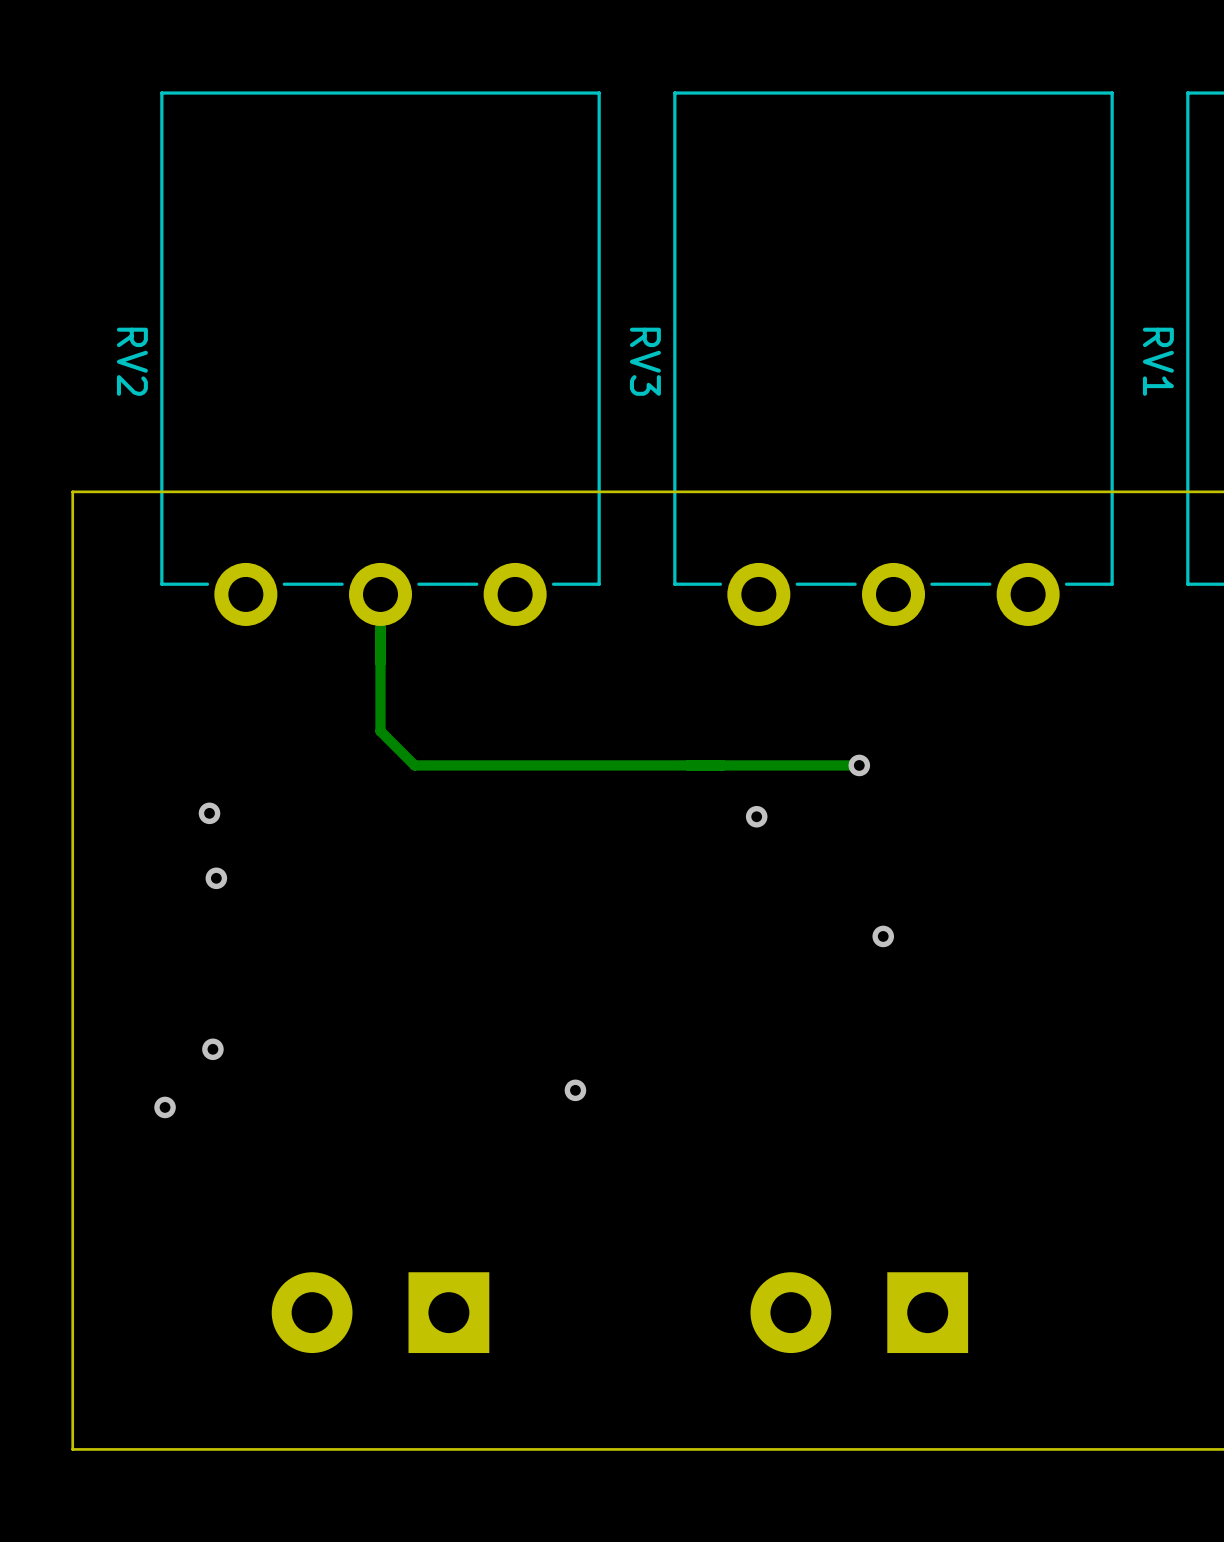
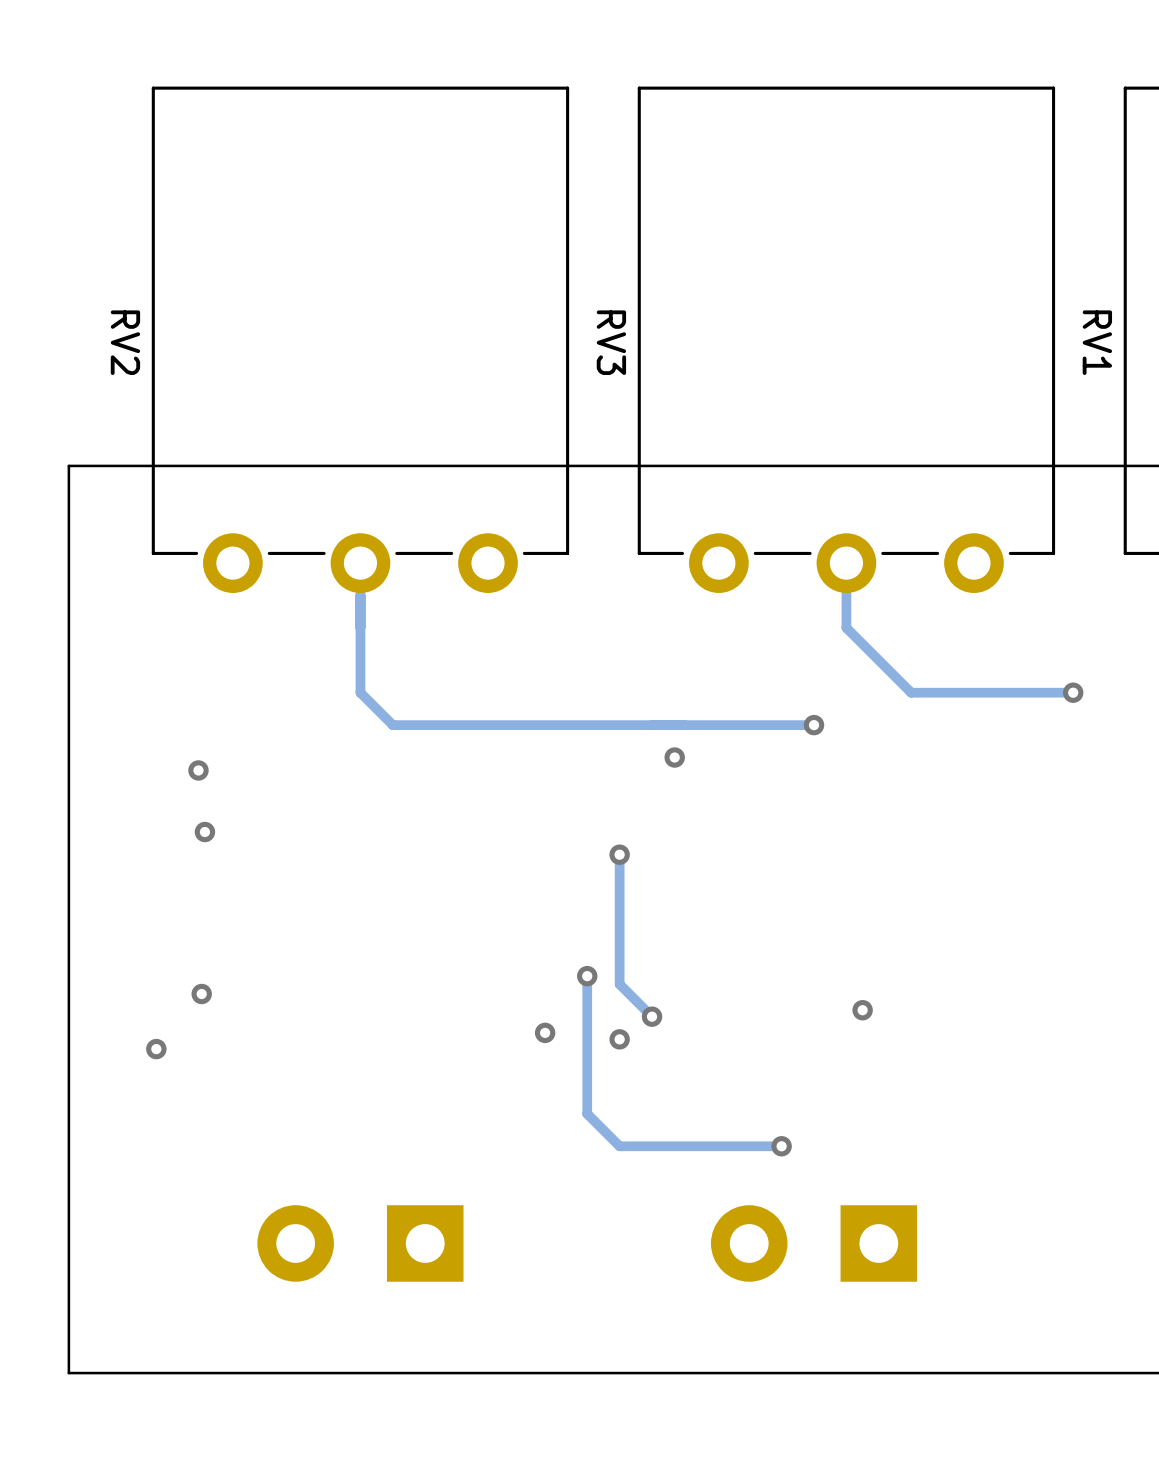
track: none -> (846, 563) (846, 627) (911, 692) (1073, 692)
via: none -> (1073, 692)
via position: (756, 816) -> (674, 757)
track: none -> (619, 854) (619, 984) (652, 1016)
via: none -> (619, 854)
via: (883, 936) -> none
track: none -> (587, 976) (587, 1113) (619, 1146) (781, 1146)
via: none -> (587, 976)
via: none -> (862, 1010)
via: none -> (652, 1016)
via: none -> (619, 1039)
via: none -> (781, 1146)

